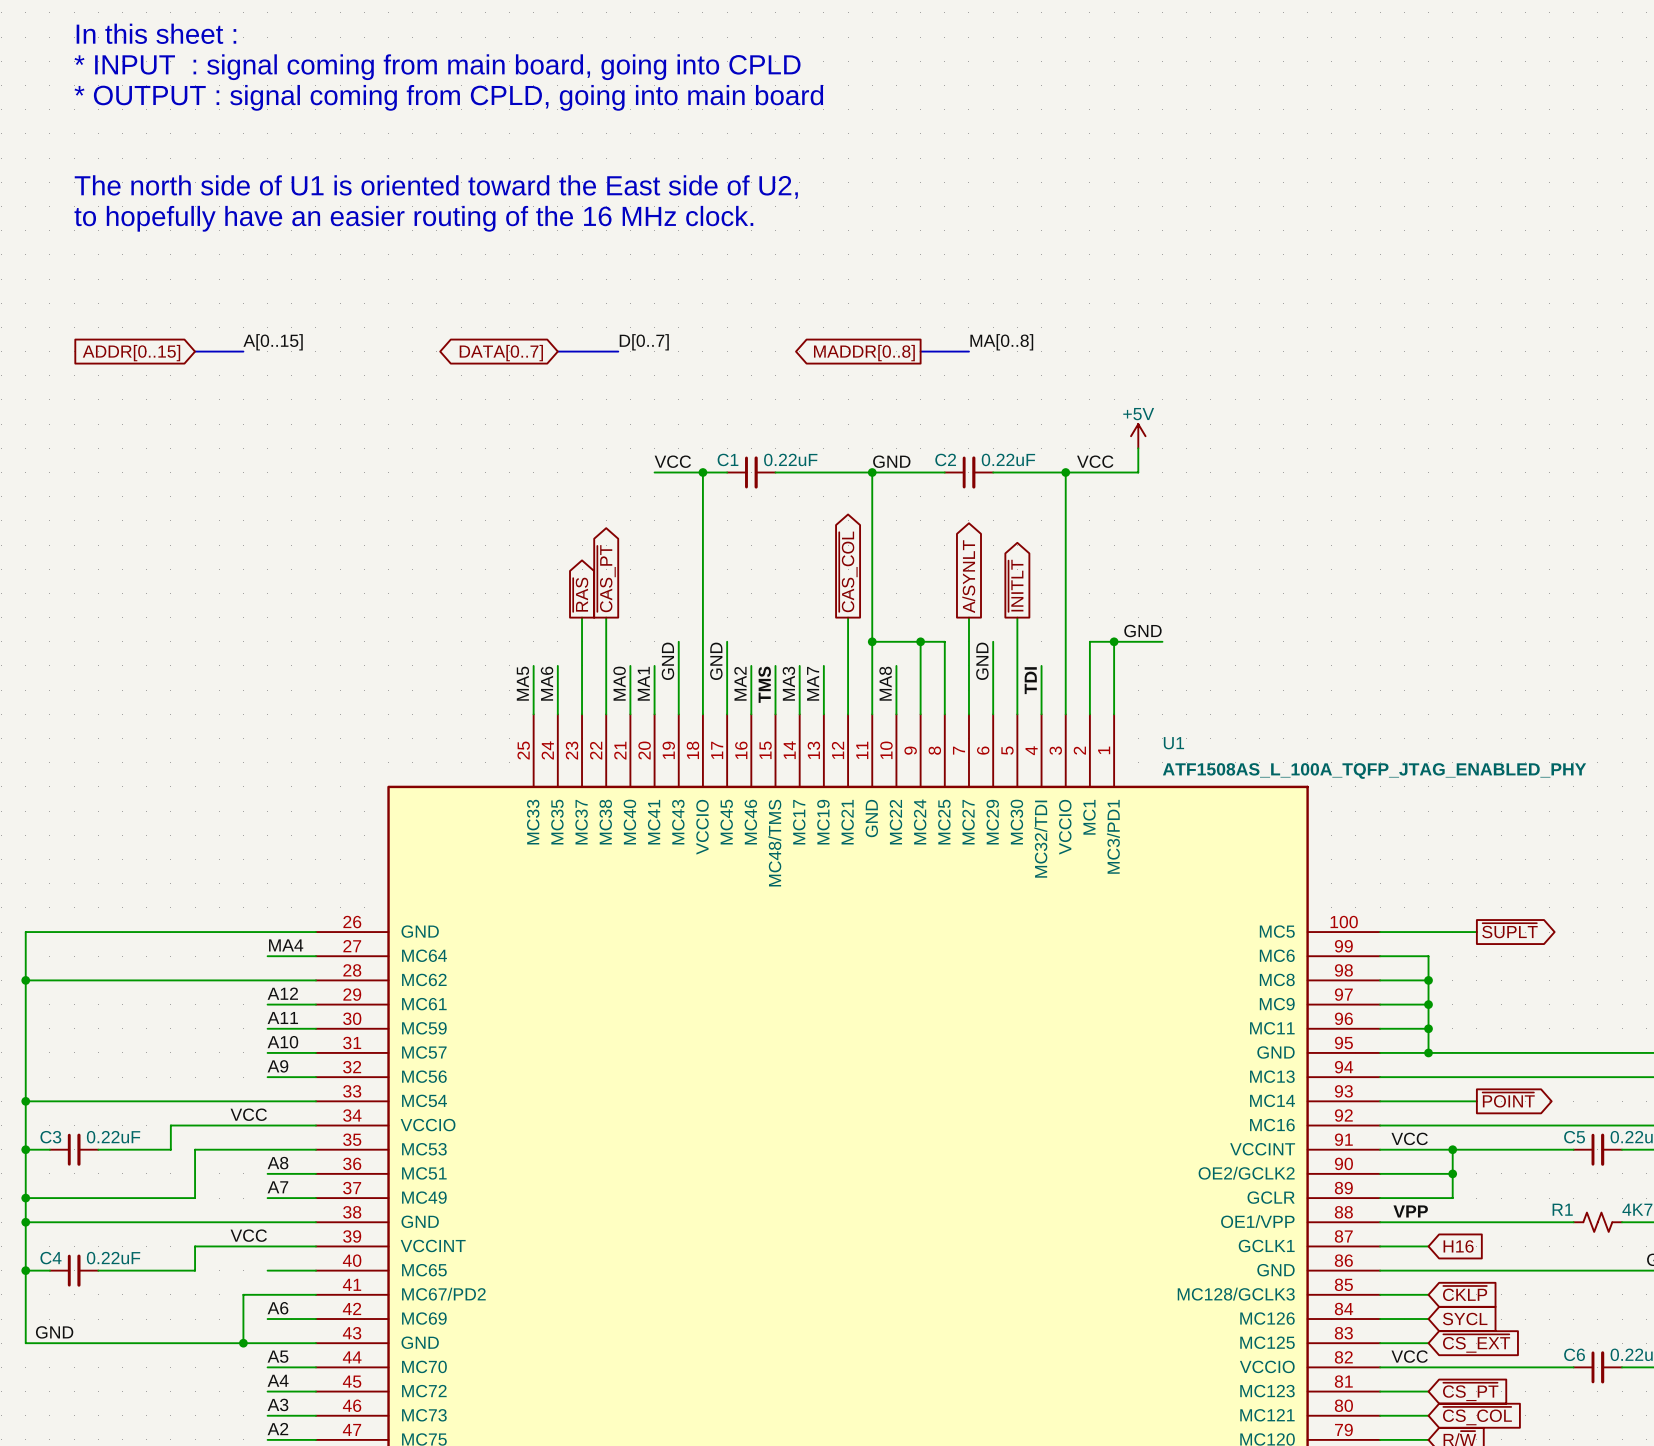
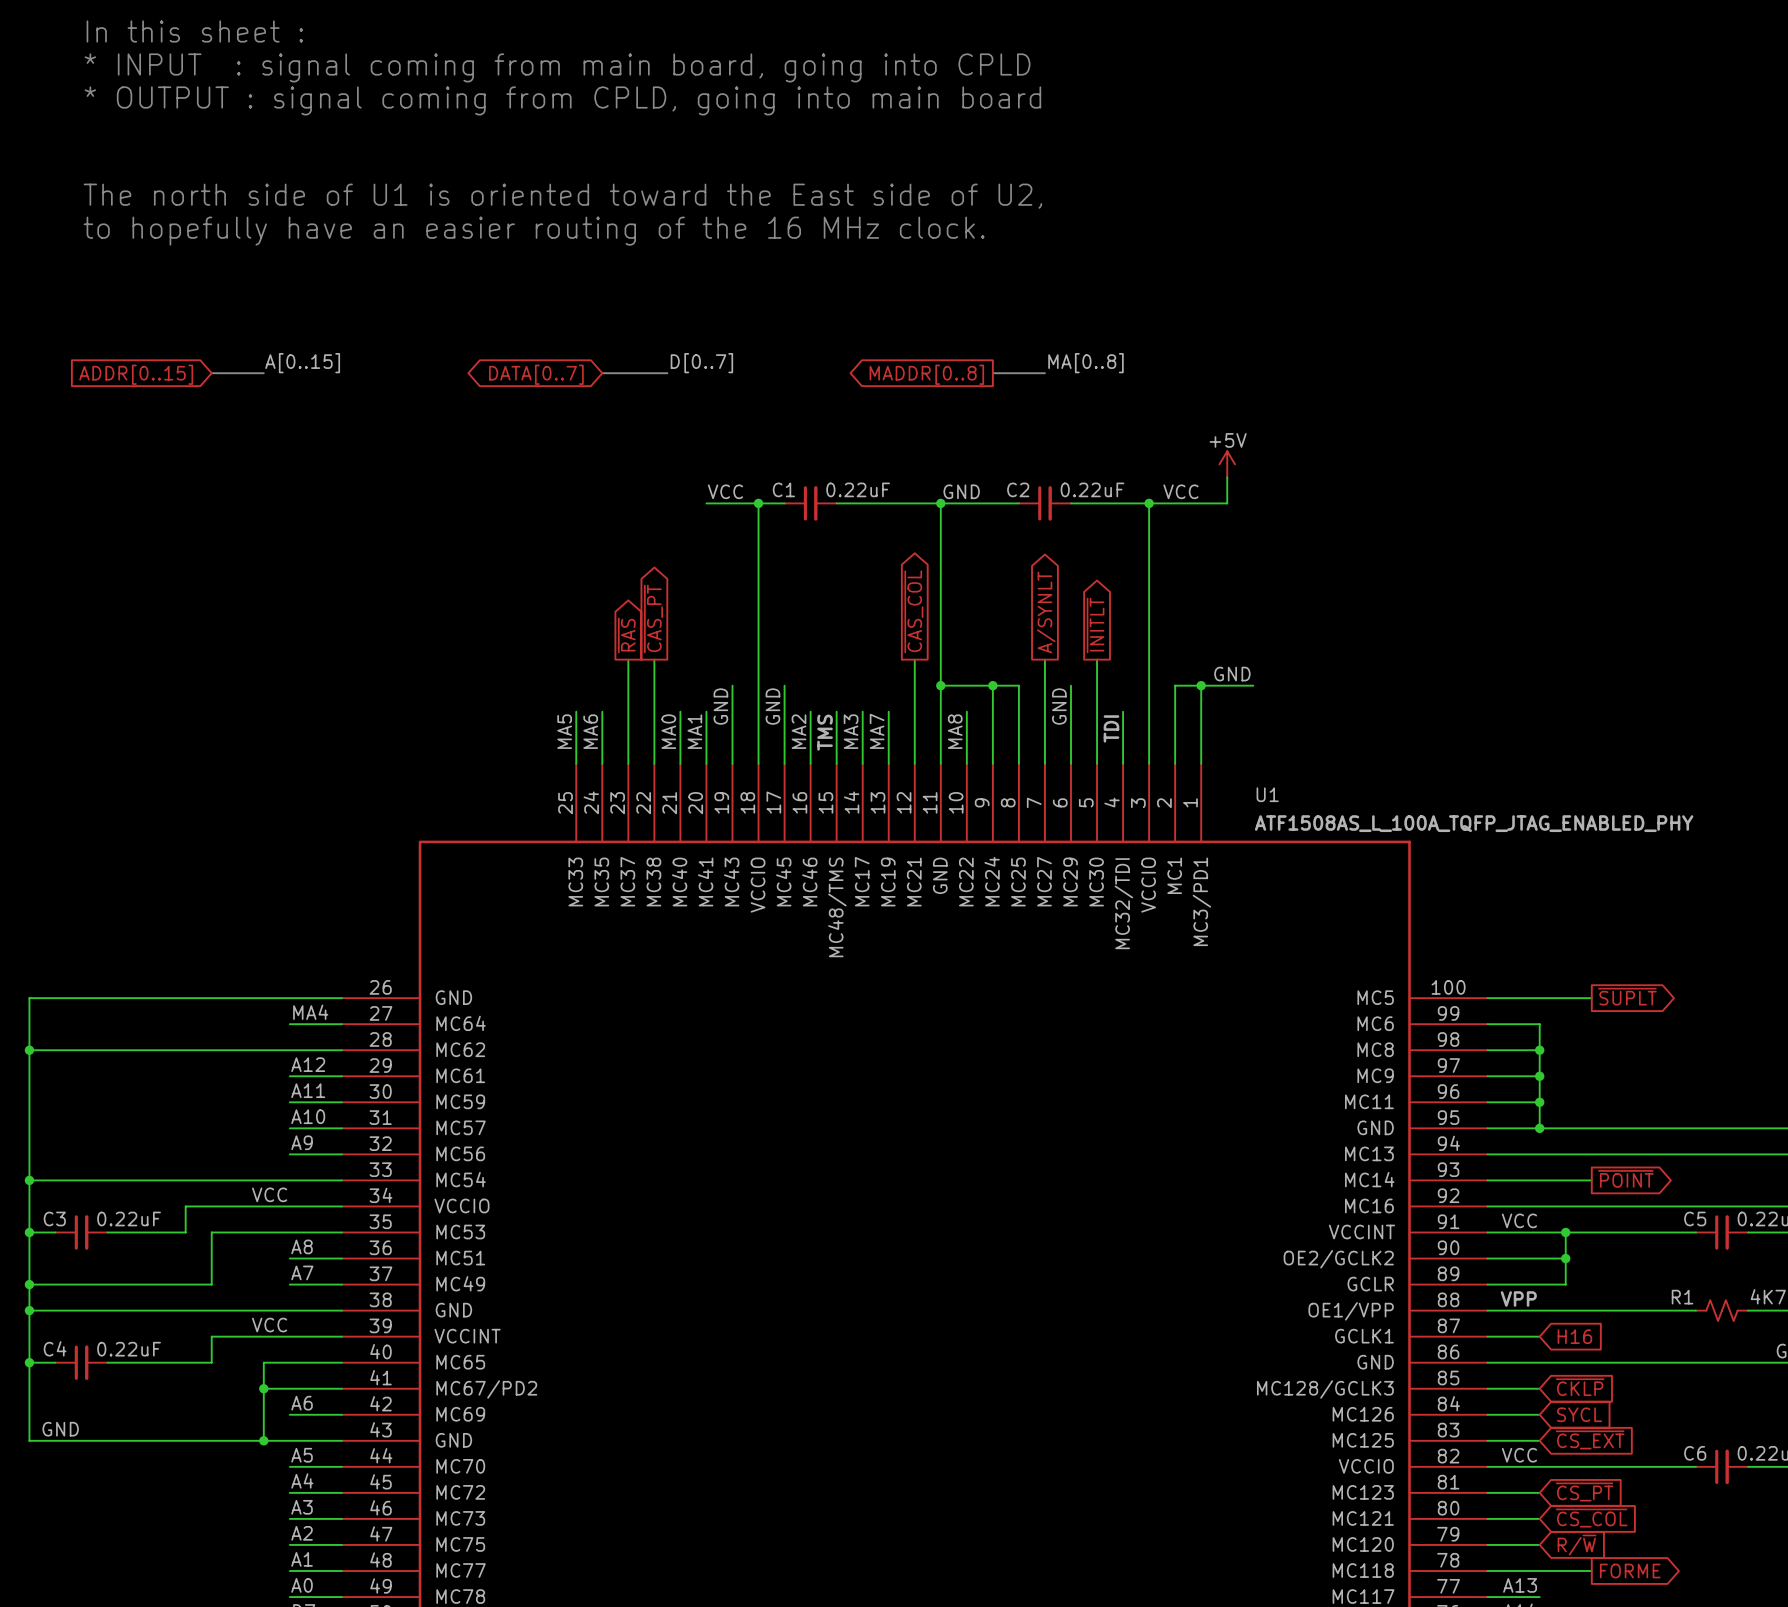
wire: none -> (289, 1362) (263, 1362) (263, 1388)
junction: none -> (263, 1388)

